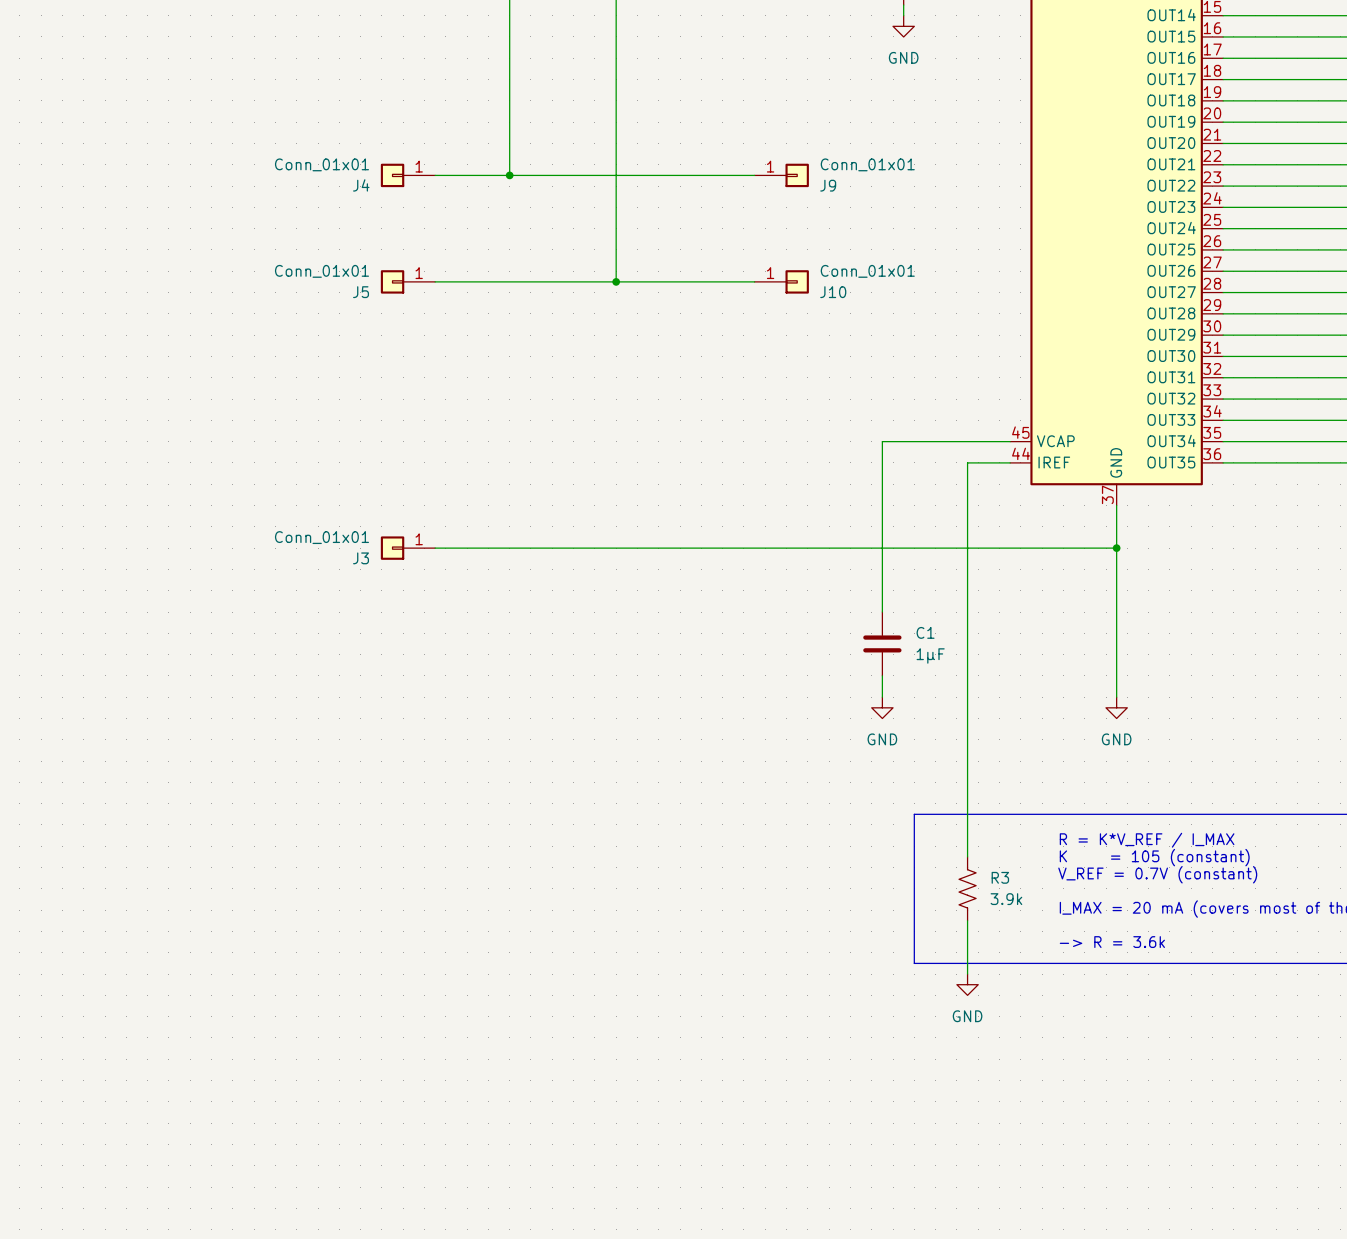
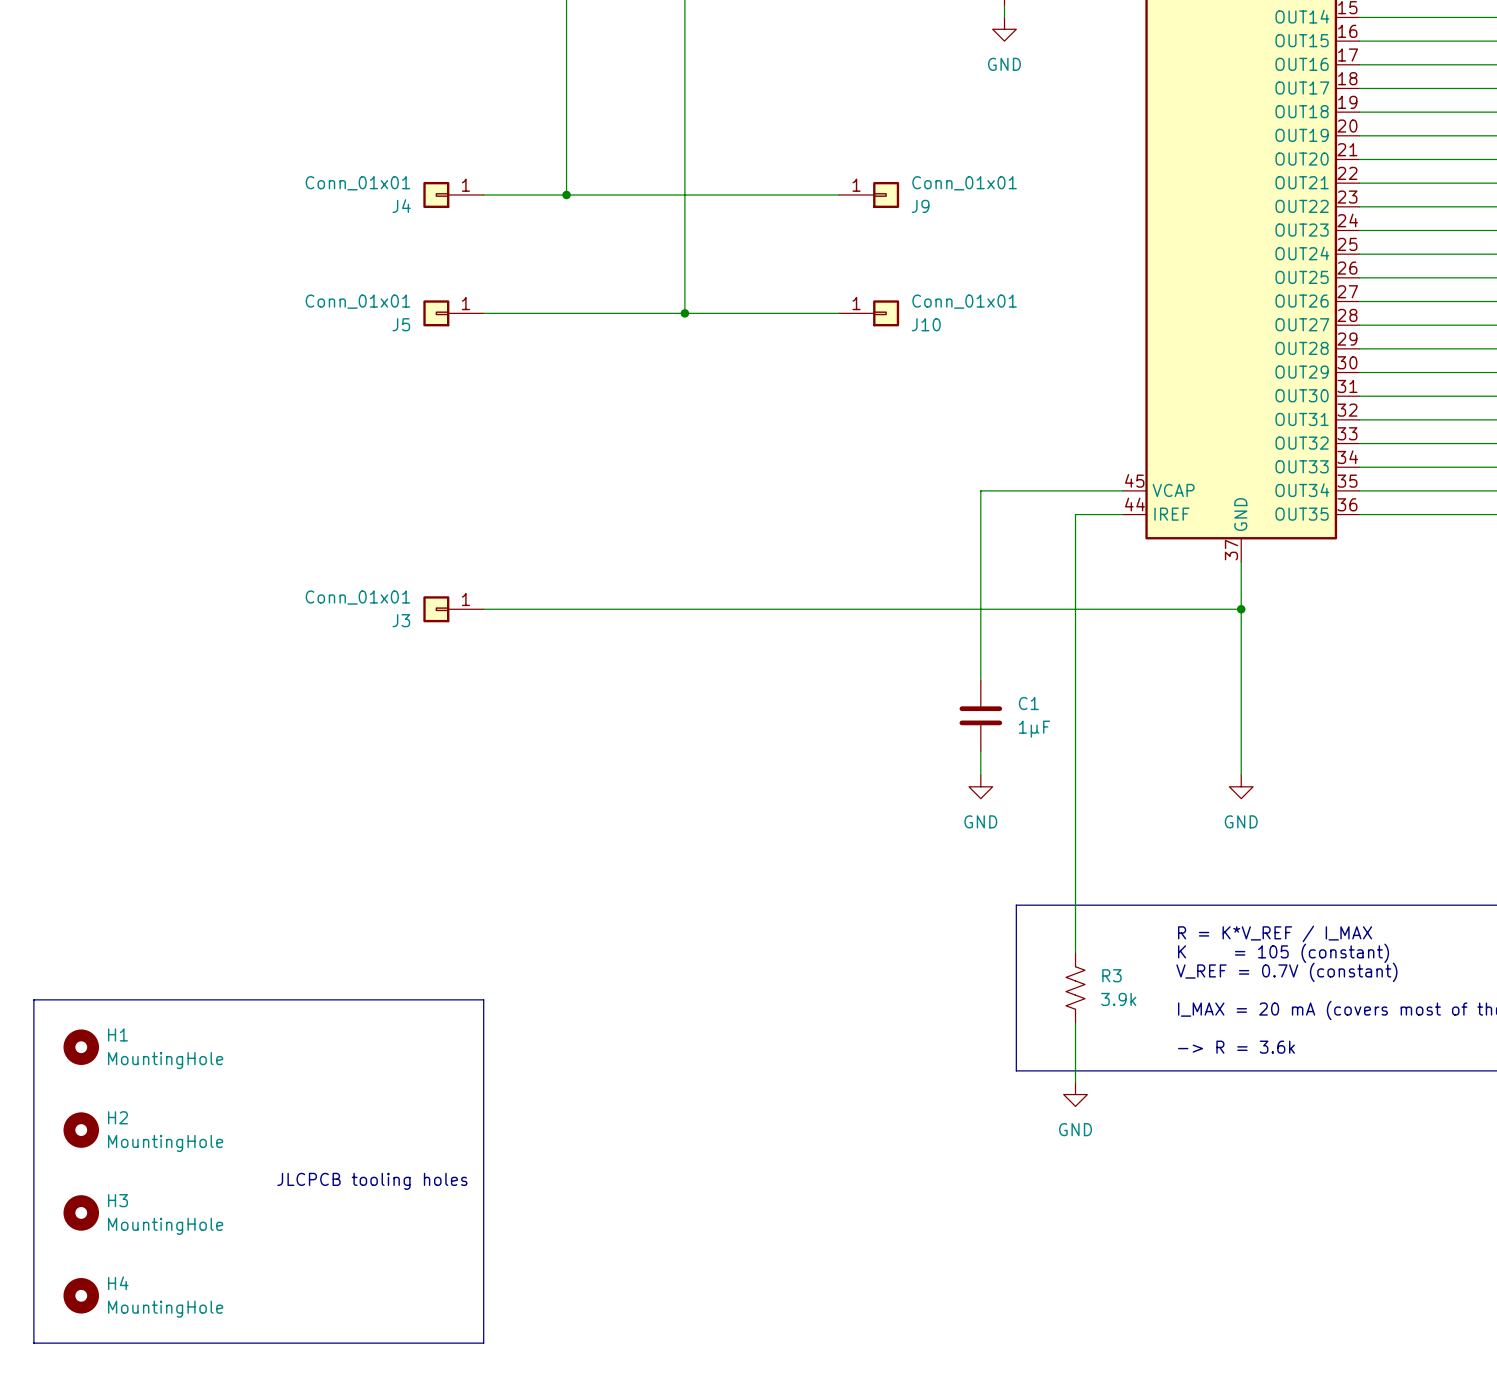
line: none -> (33, 999) (483, 999) (483, 1343) (33, 1343) (33, 999)
H1: none -> MountingHole (81, 1047)
H2: none -> MountingHole (81, 1130)
text: none -> JLCPCB tooling holes (372, 1181)
H3: none -> MountingHole (81, 1212)
H4: none -> MountingHole (81, 1295)

